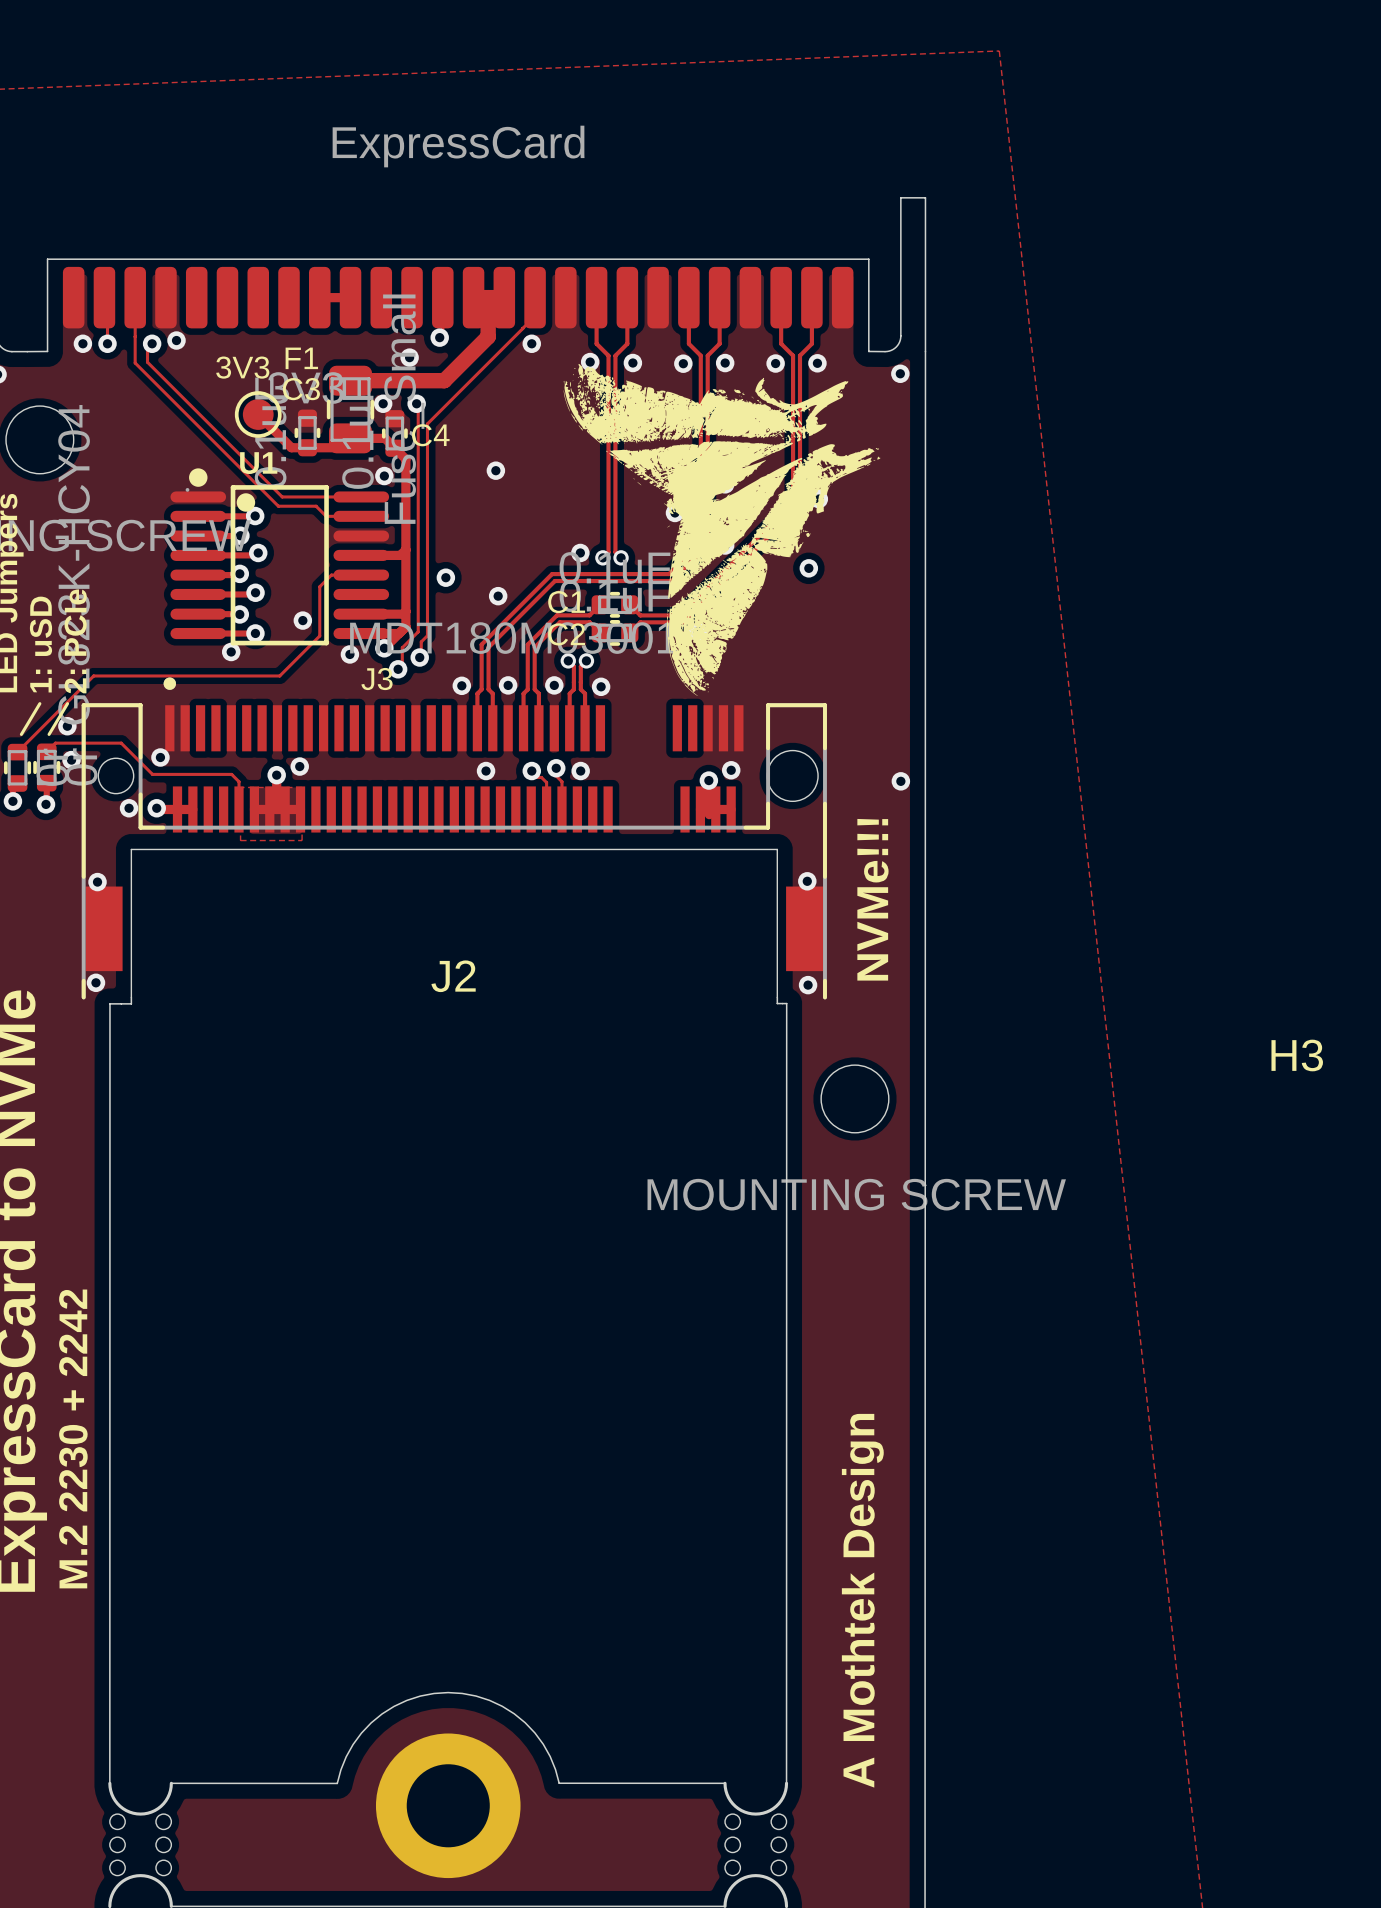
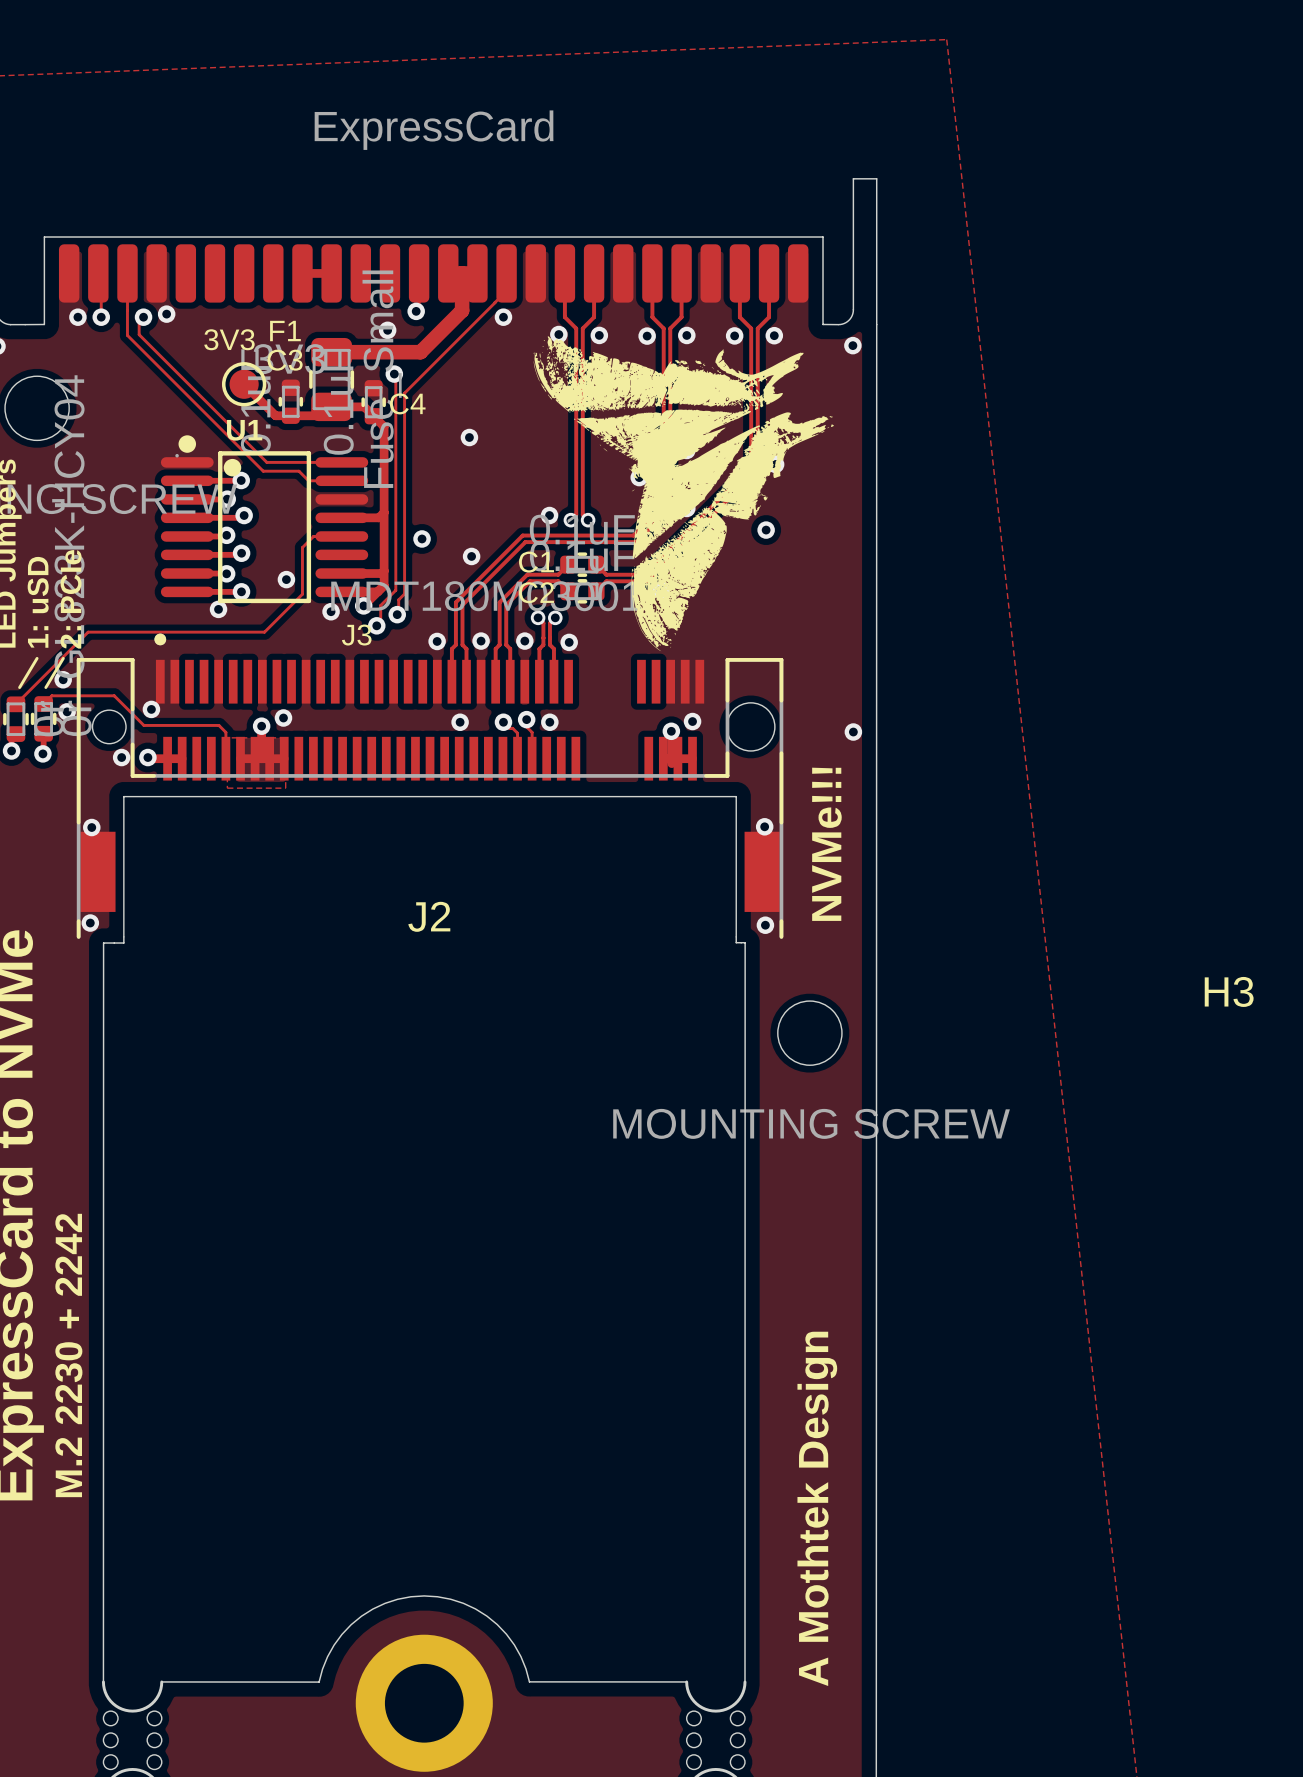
via: (383, 403) -> none
via: (384, 476) -> none

